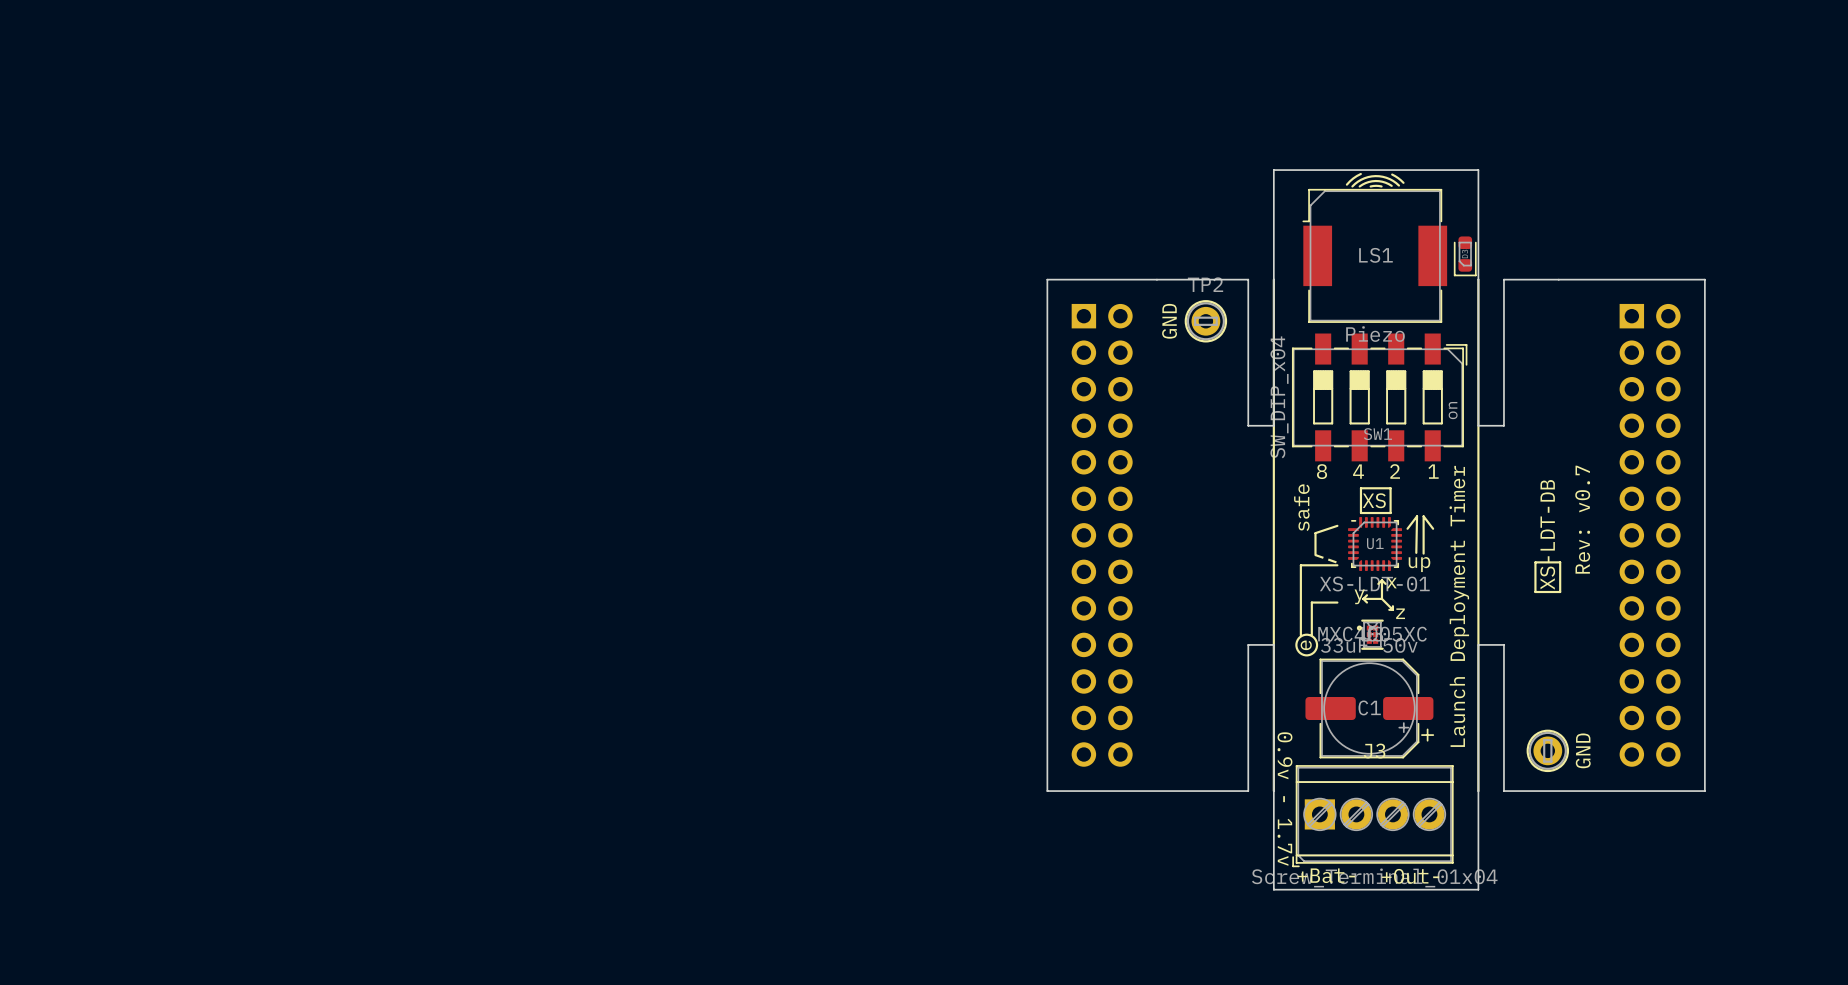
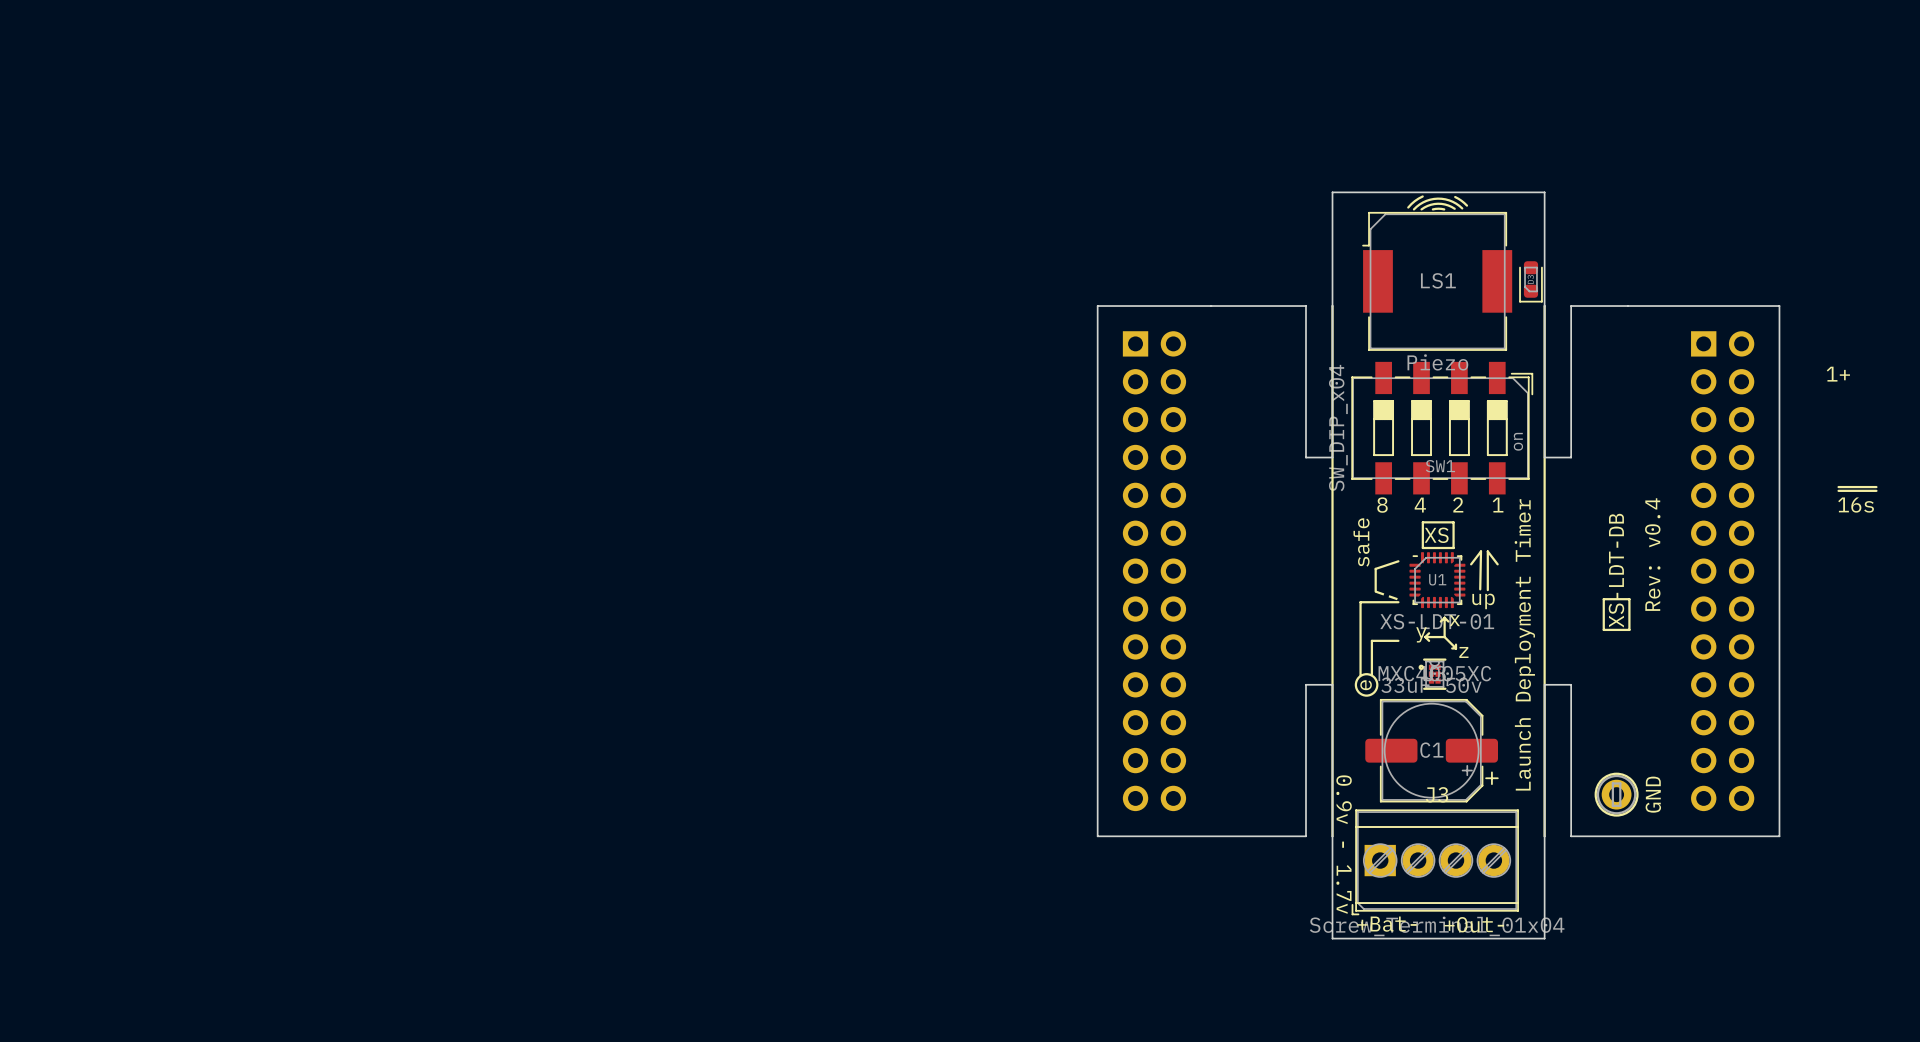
TP2: GND (1205, 321) -> none
text: none -> 1+ (1838, 374)
line: none -> (1838, 487) (1876, 487)
line: none -> (1838, 490) (1876, 490)
text: none -> 16s (1856, 505)
text: Rev: v0.7 (1582, 519) -> Rev: v0.4 (1652, 554)

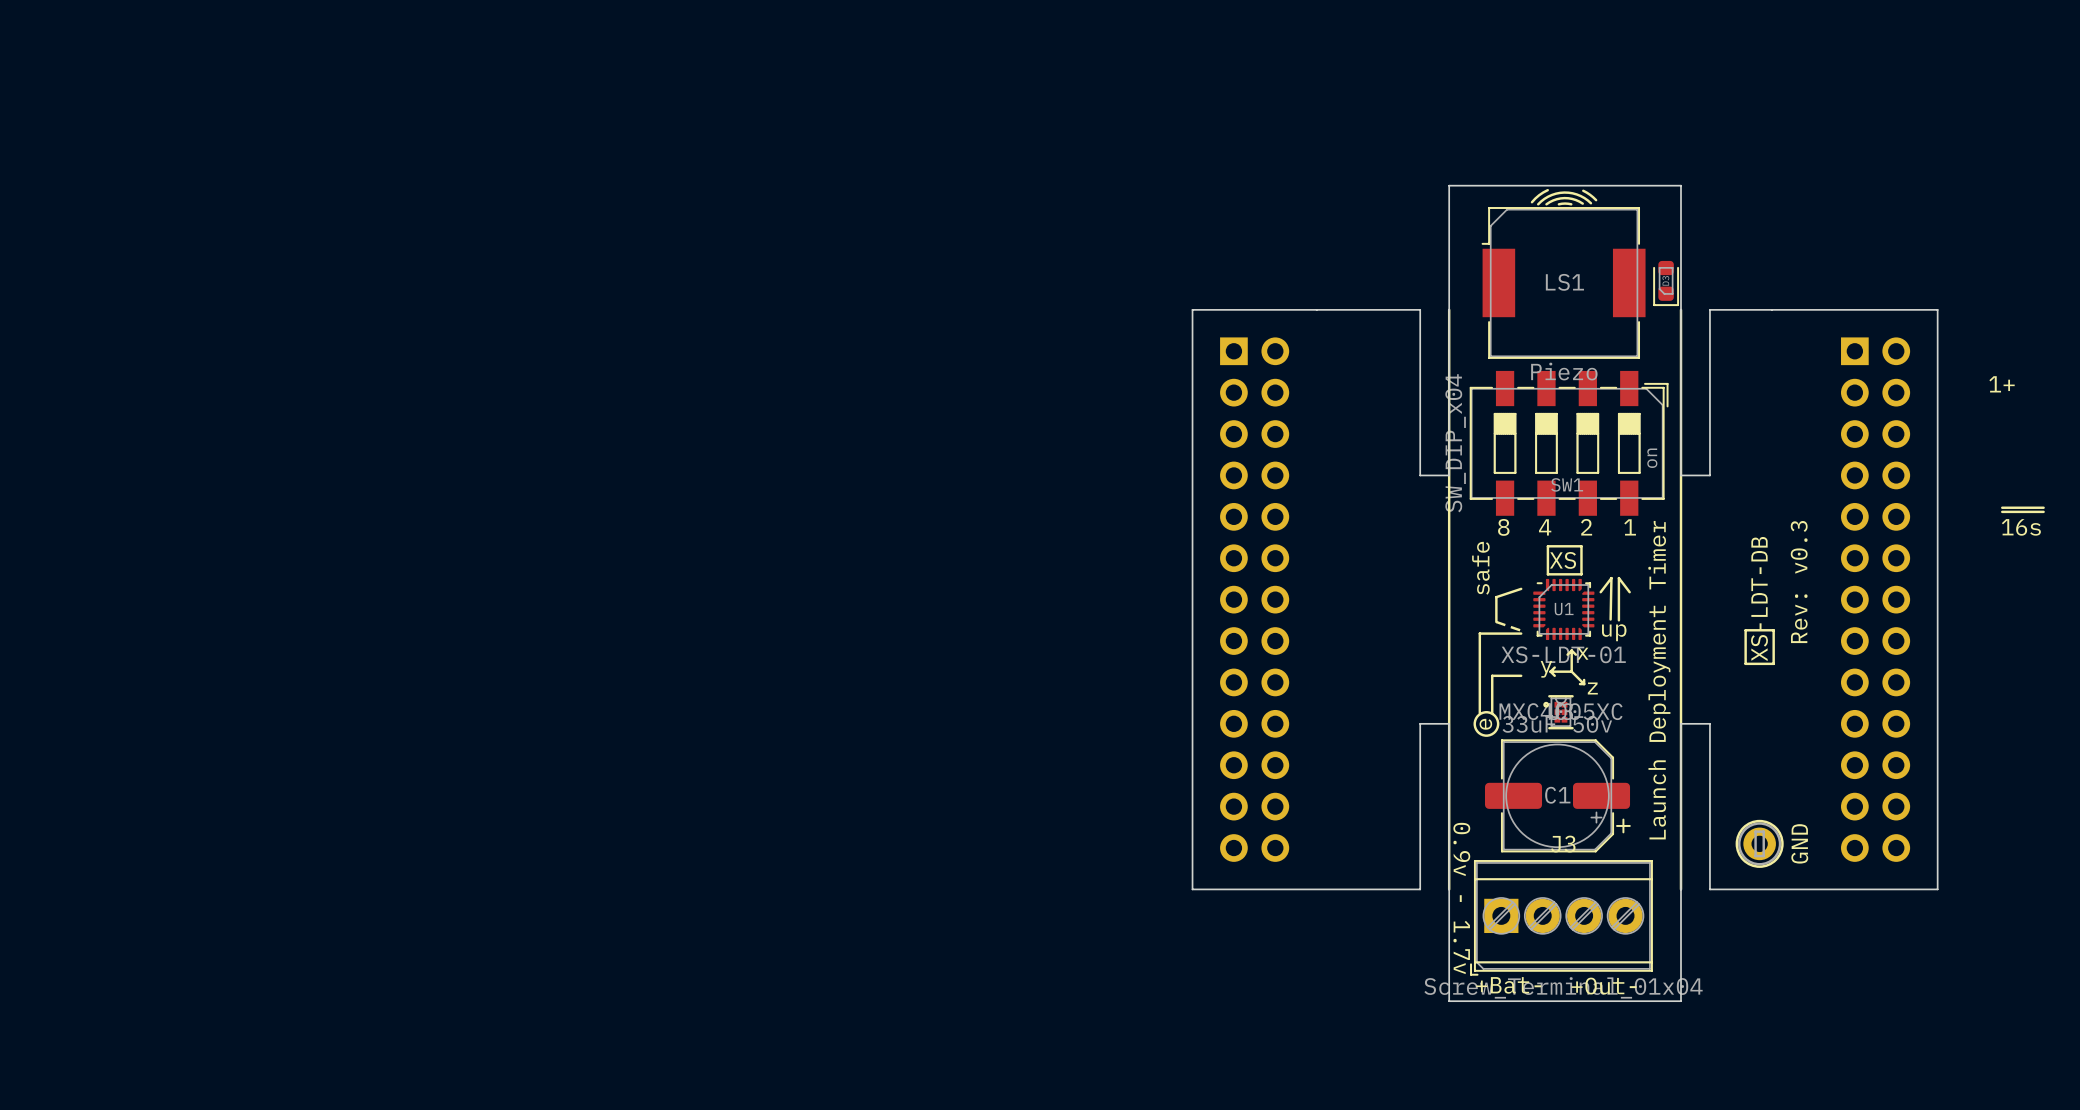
text: Rev: v0.4 (1652, 554) -> Rev: v0.3 (1799, 582)

